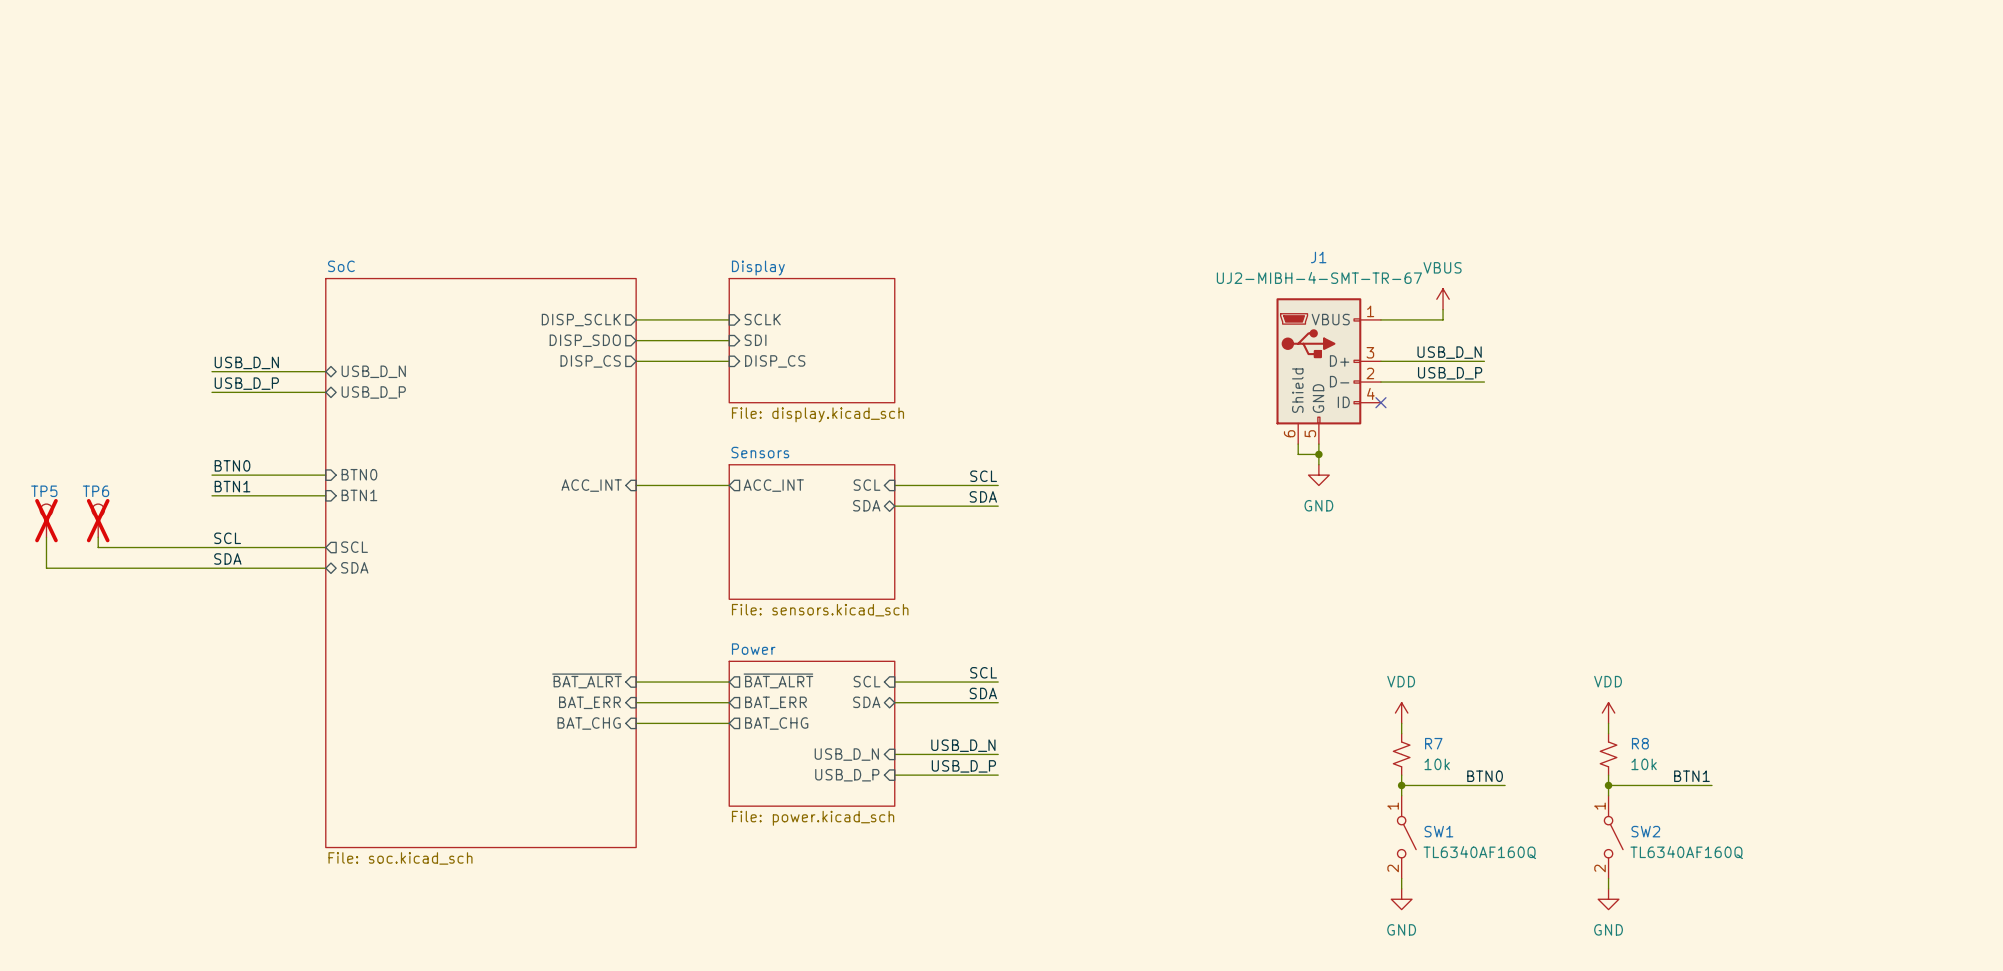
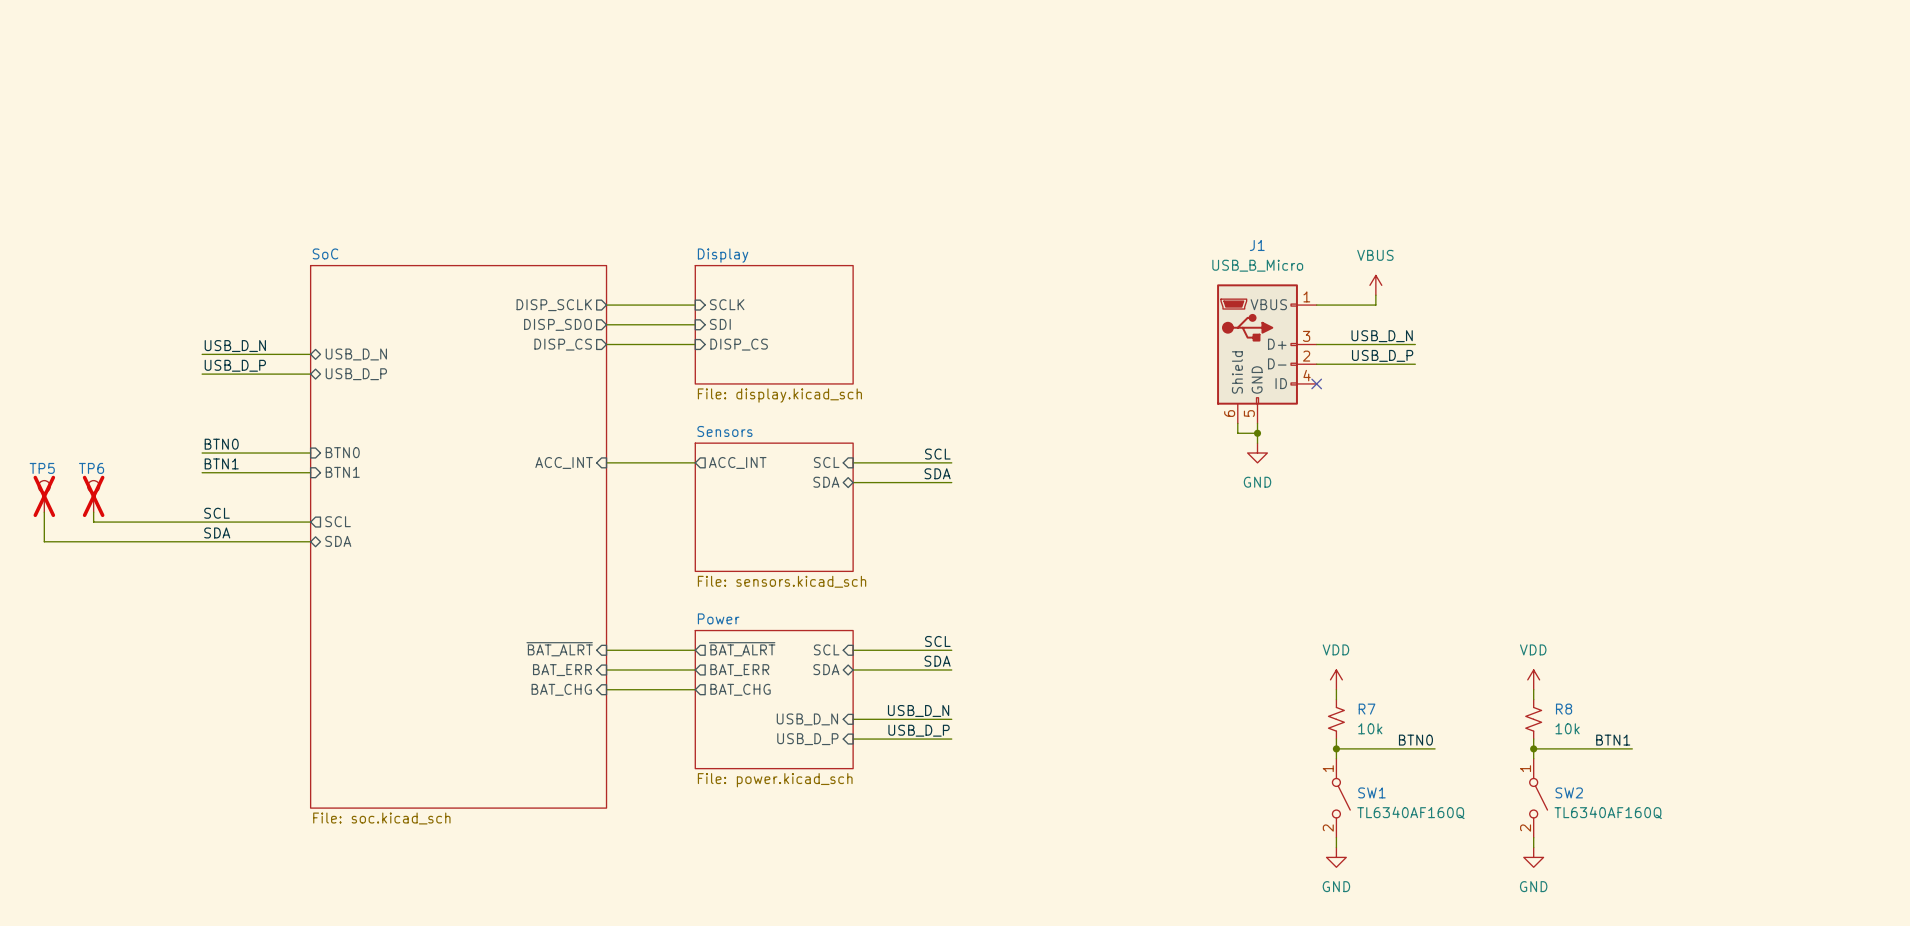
J1 value: UJ2-MIBH-4-SMT-TR-67 (1319, 277) -> USB_B_Micro (1257, 265)

